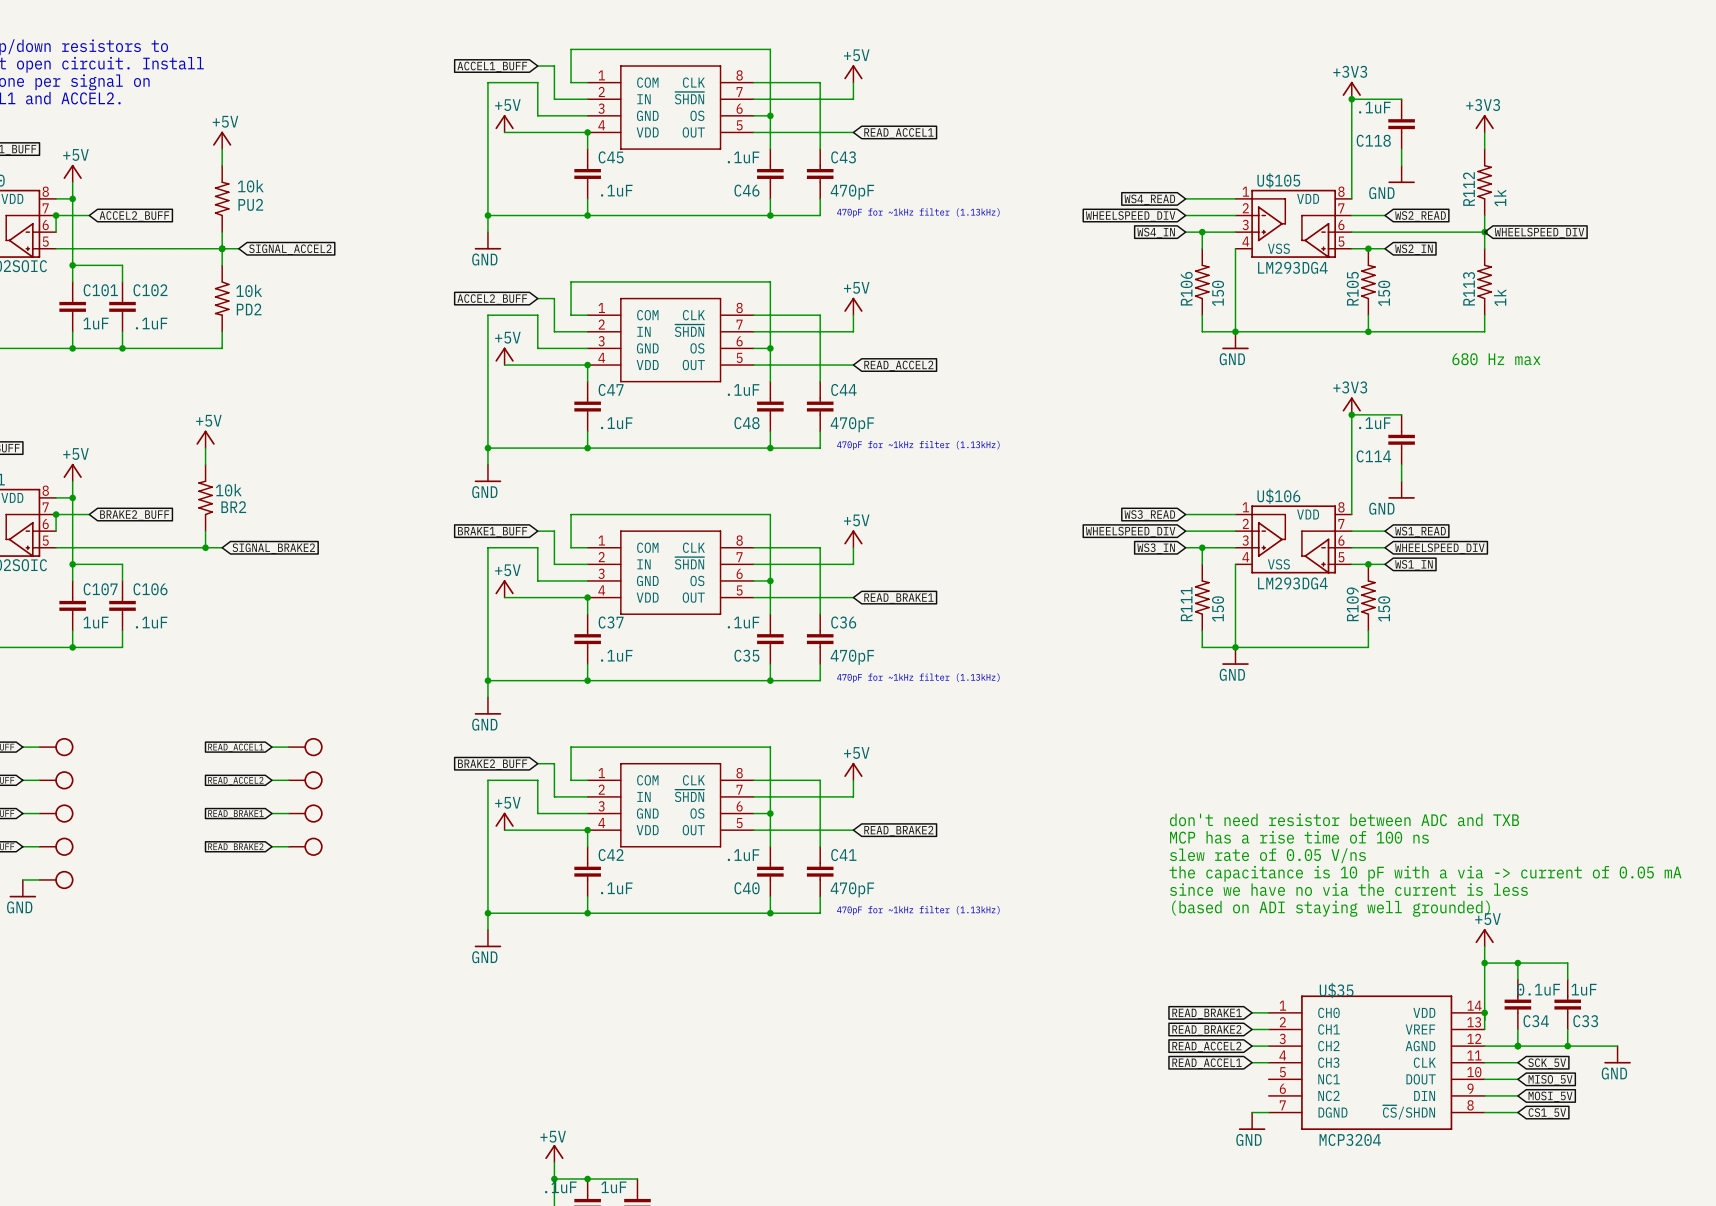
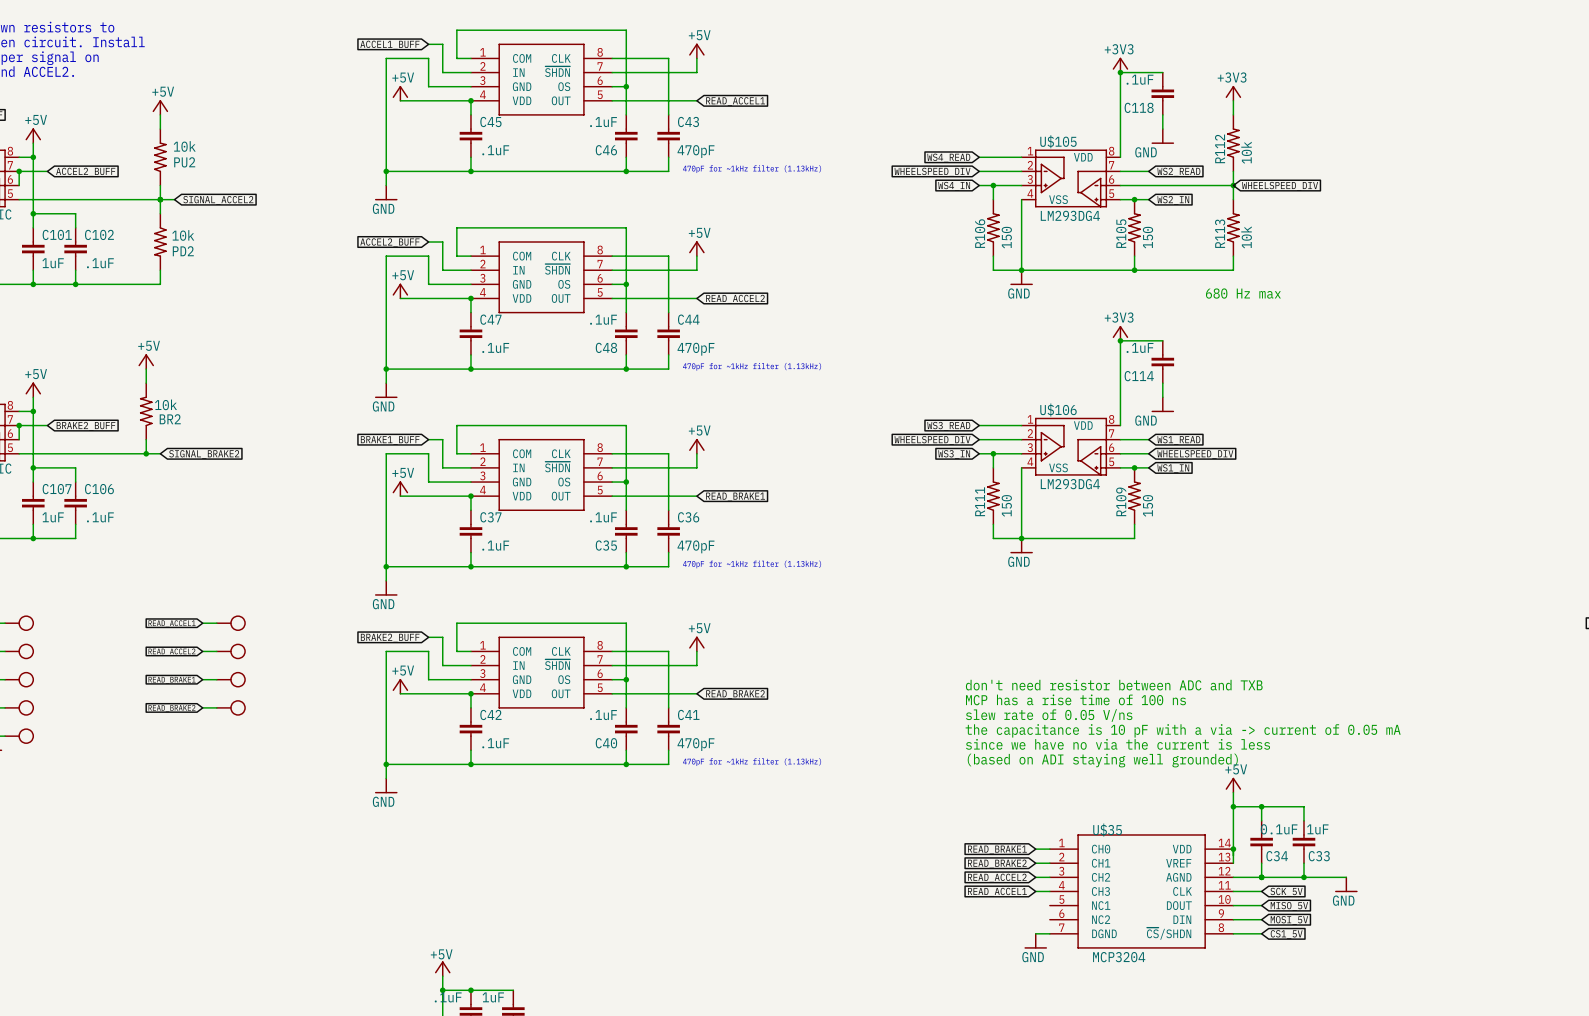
R112 value: 1k (1500, 198) -> 10k (1246, 152)
R113 value: 1k (1500, 297) -> 10k (1246, 237)

